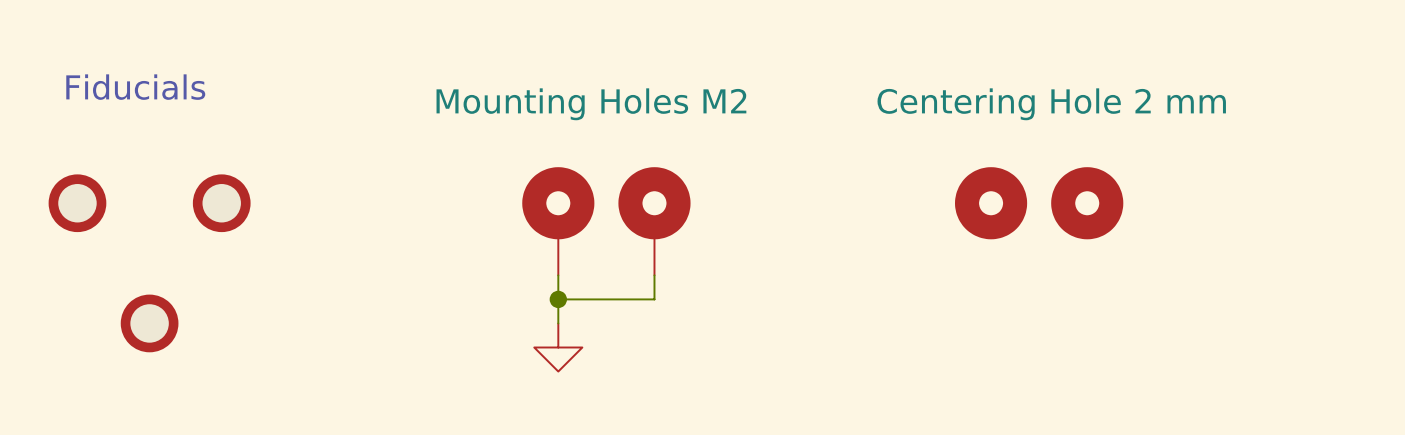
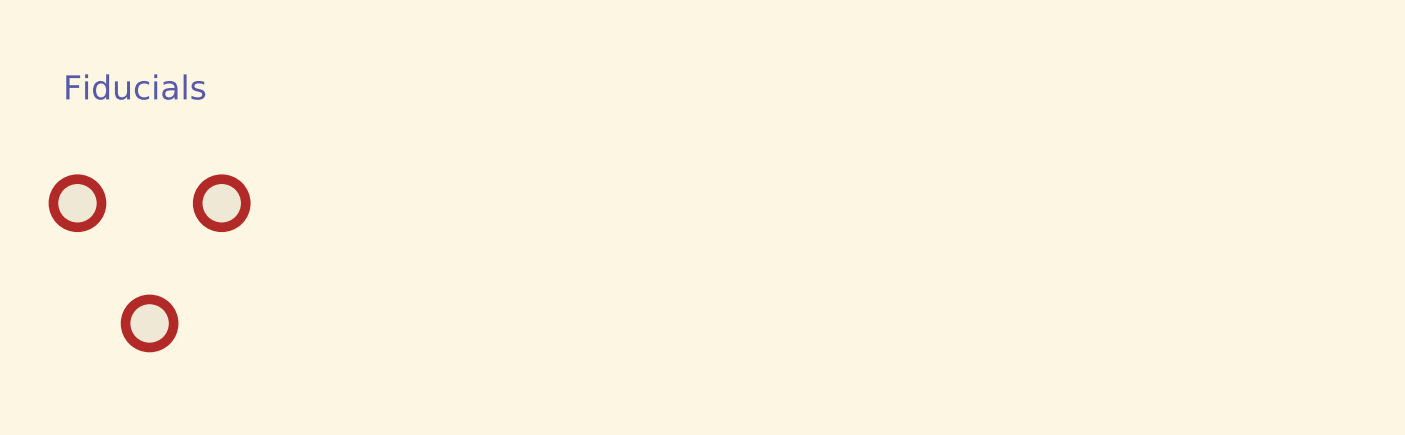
part: Centering Hole 2 mm (991, 203) -> none
part: (1087, 203) -> none
part: Mounting Holes M2 (558, 221) -> none
part: (654, 221) -> none
wire: (558, 275) (558, 323) -> none
wire: (654, 275) (654, 299) (558, 299) -> none
junction: (558, 299) -> none
power symbol: (558, 347) -> none

